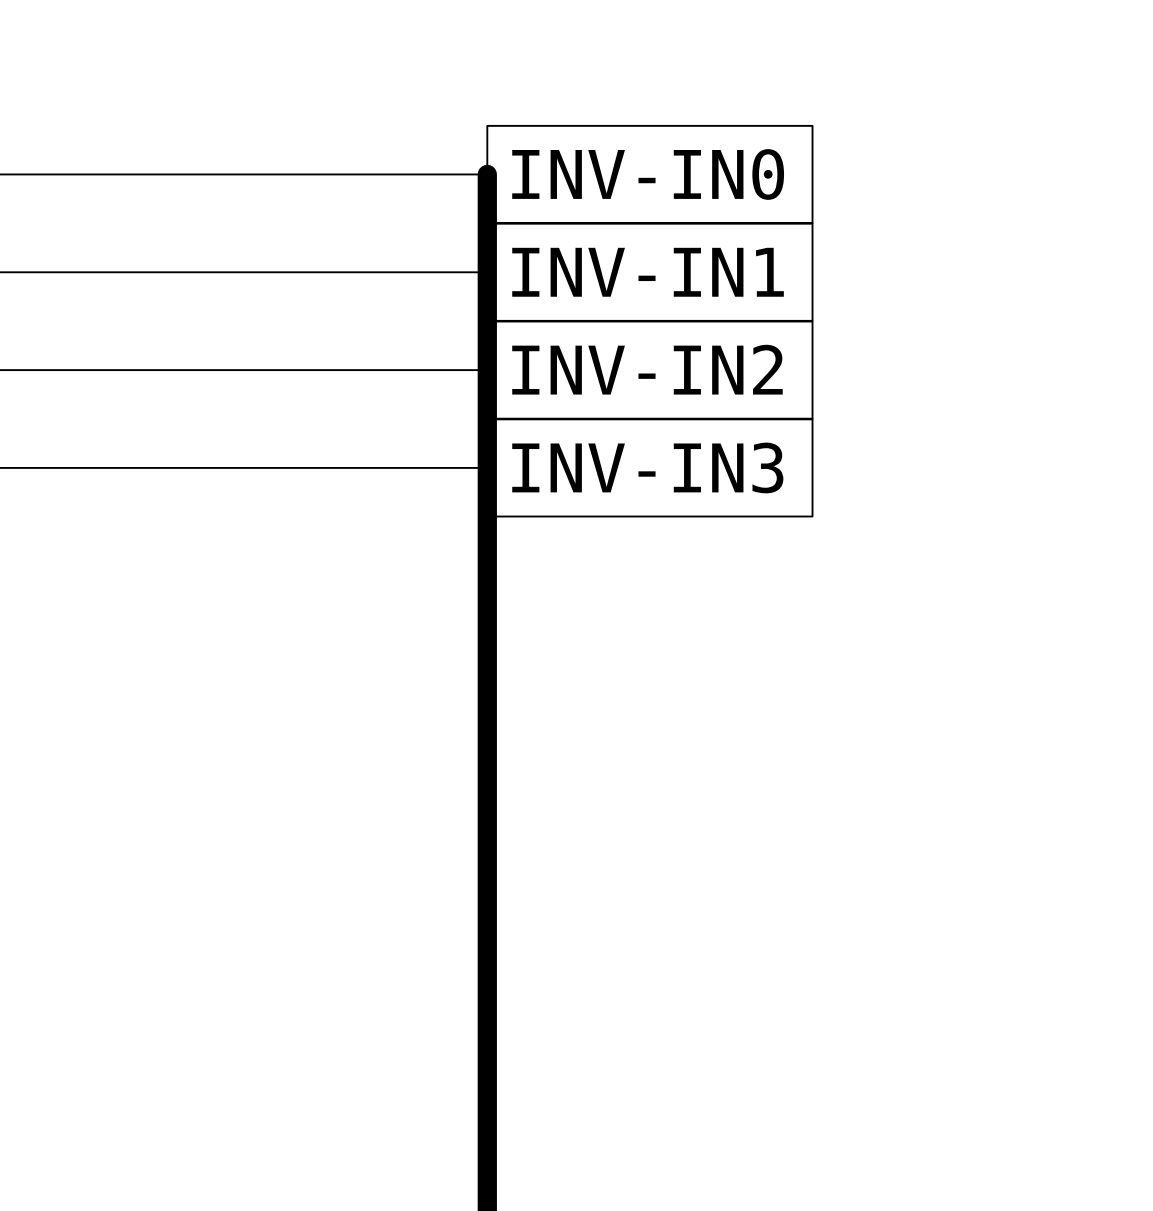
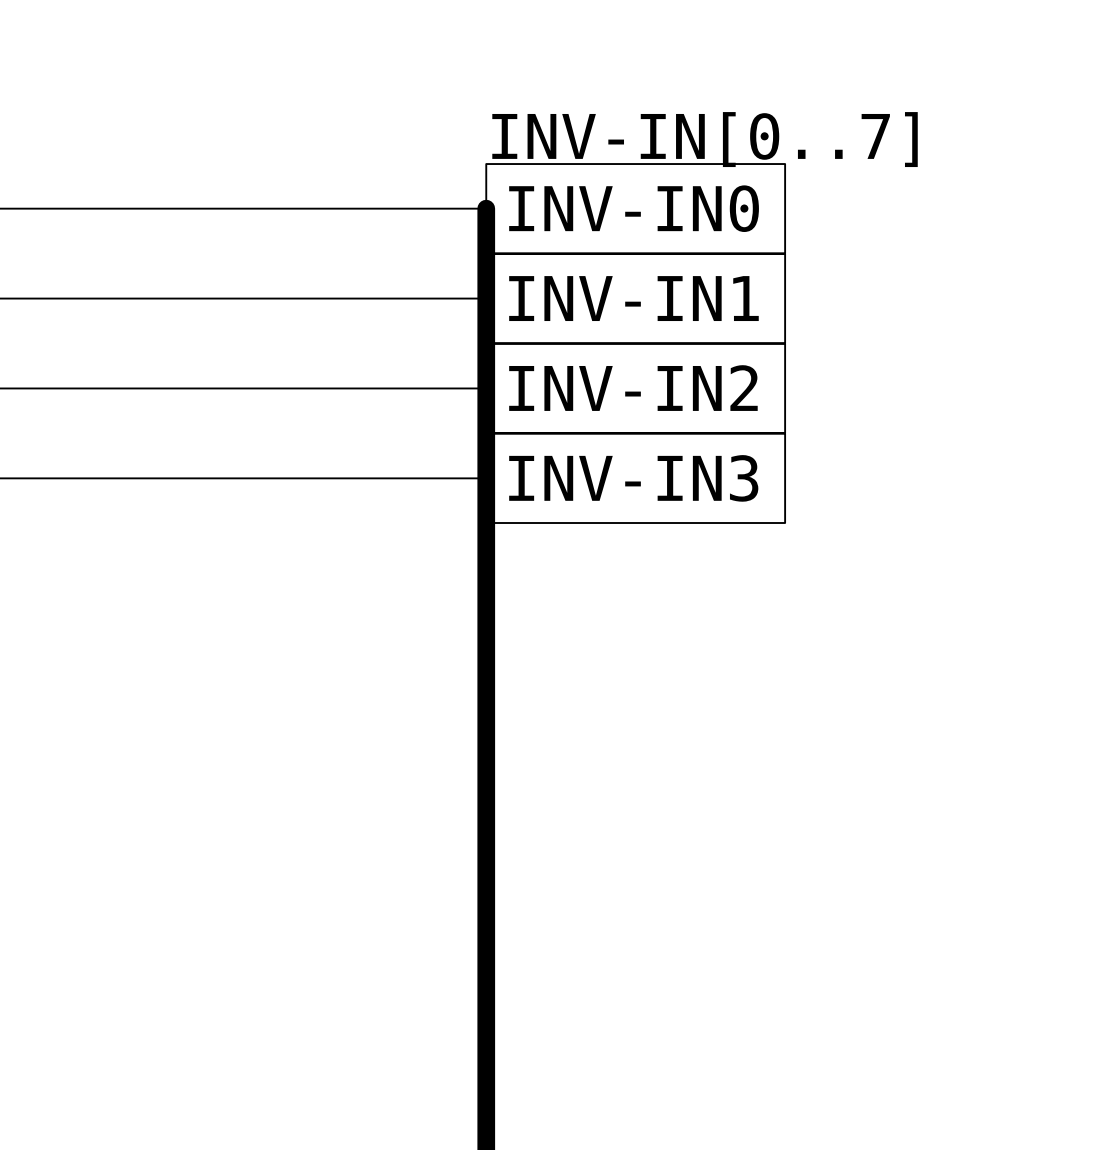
text: none -> INV-IN[0..7] (705, 139)

